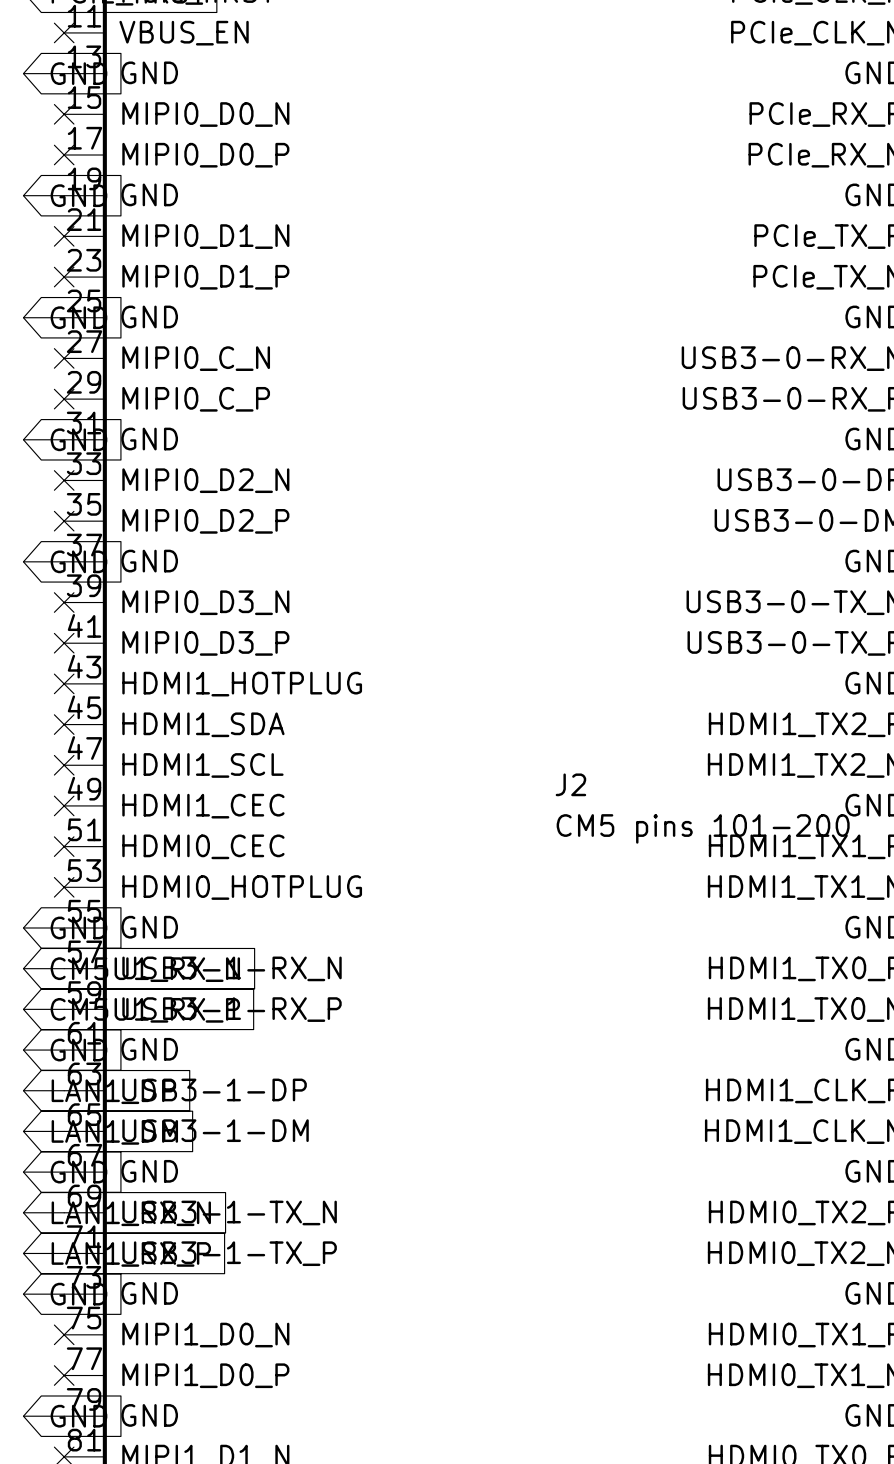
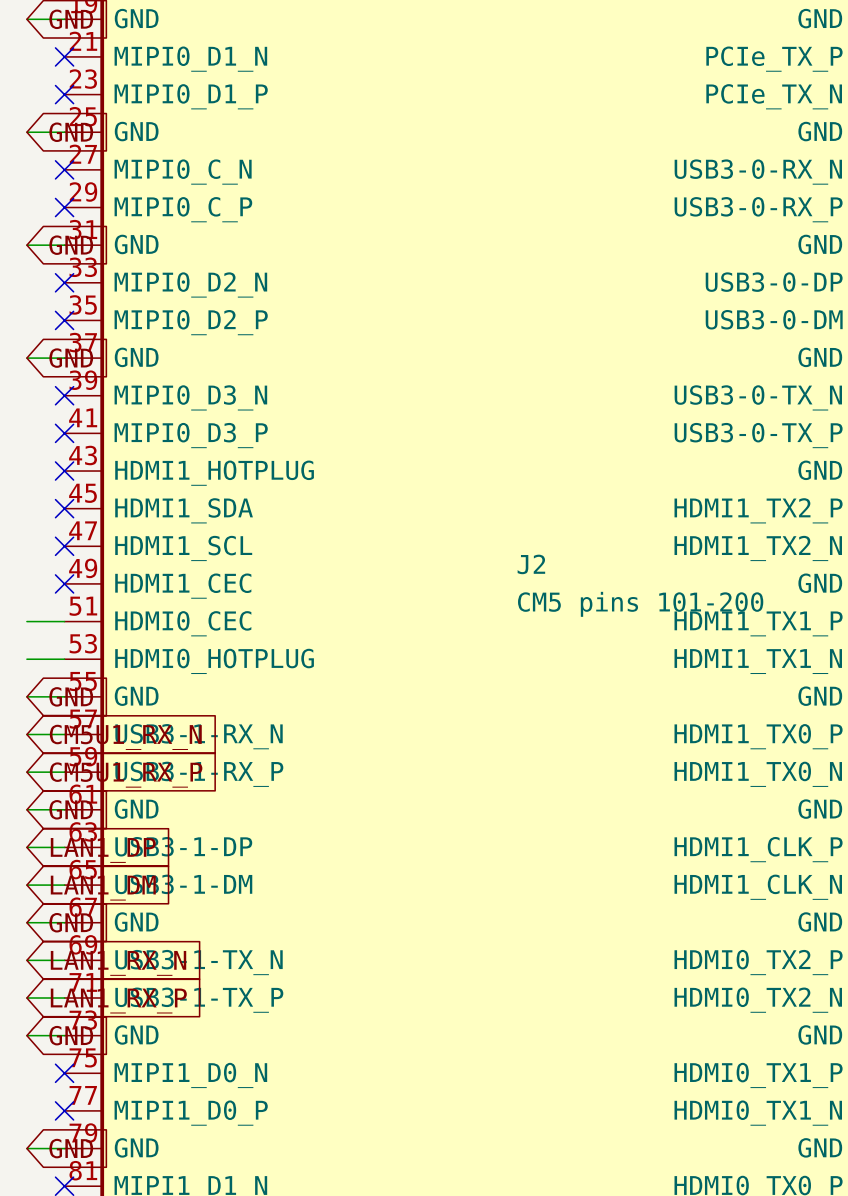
wire: none -> (26, 621) (64, 621)
no-connect mark: (64, 846) -> none
wire: none -> (26, 659) (64, 659)
no-connect mark: (64, 887) -> none

